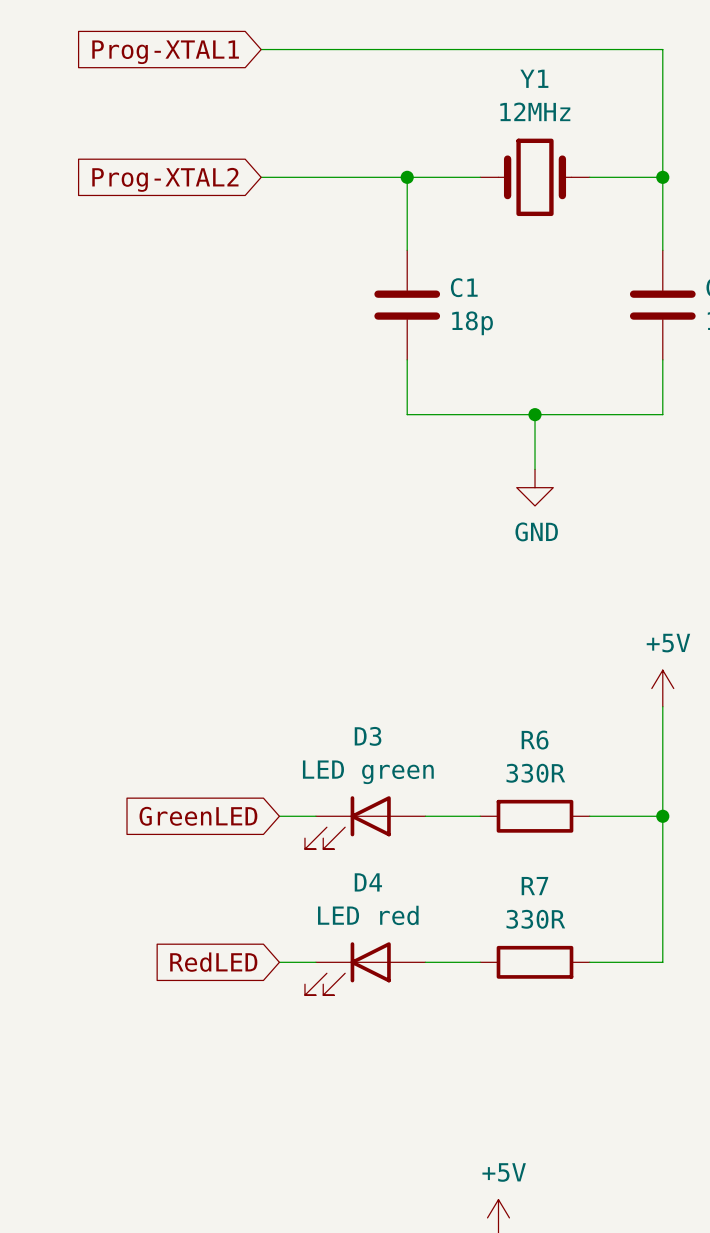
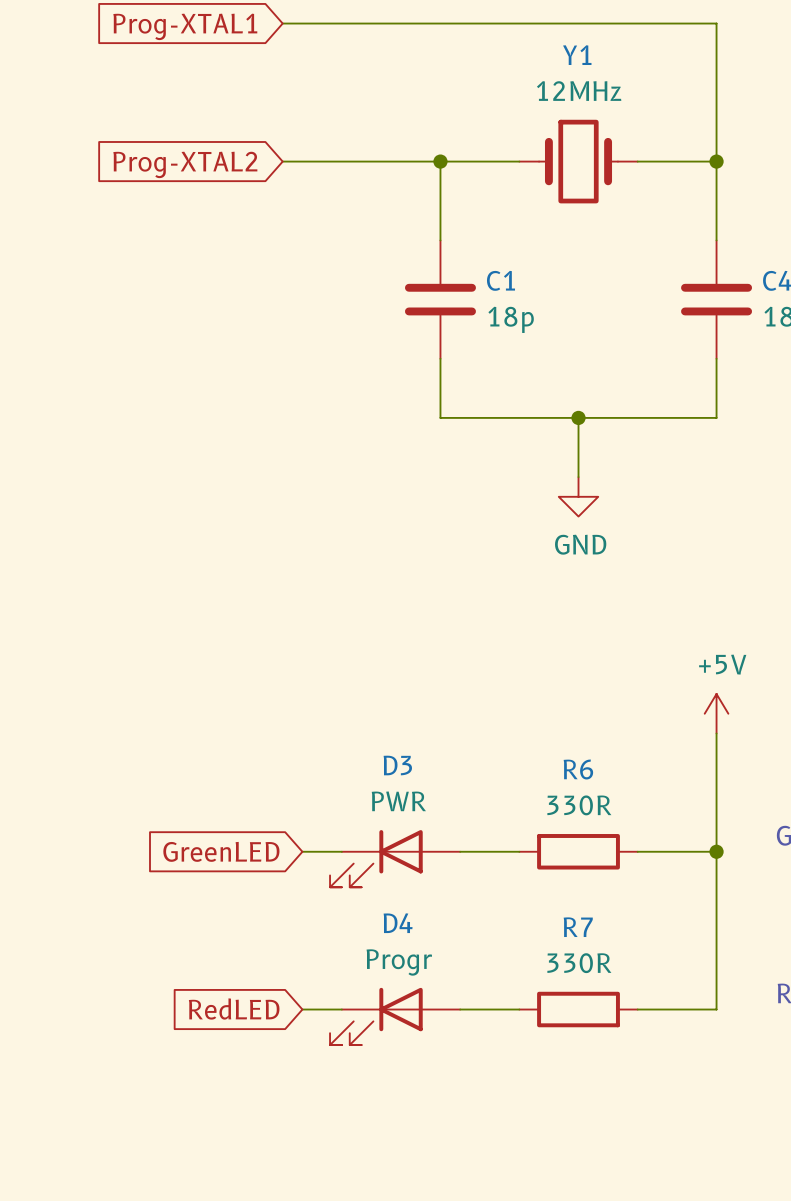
D3 value: LED green (368, 772) -> PWR (398, 801)
D4 value: LED red (368, 915) -> Progr (399, 962)

